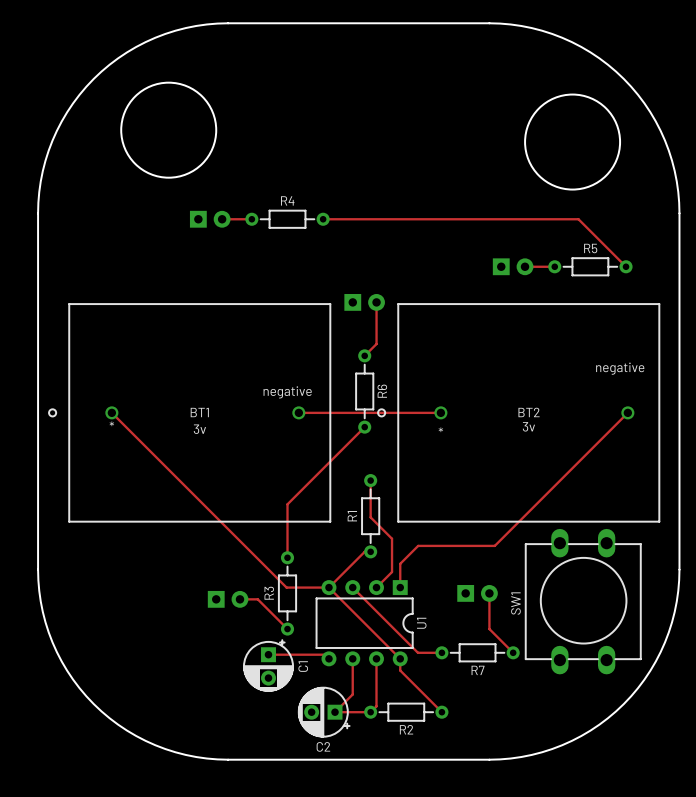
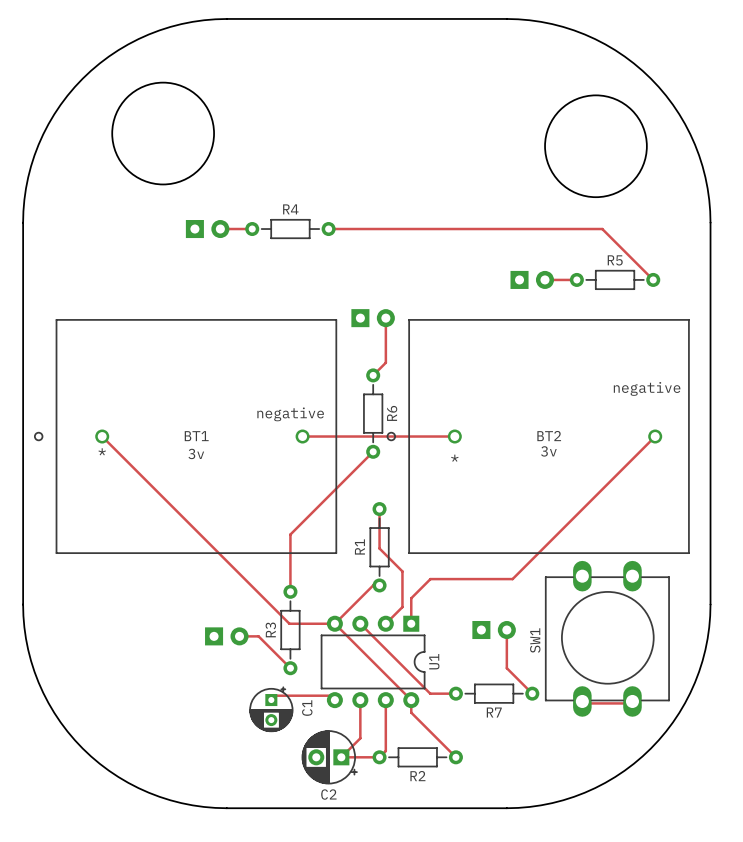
C1 footprint: [243, 639, 294, 692] -> [249, 686, 294, 732]
track: none -> (582, 703) (632, 703)

